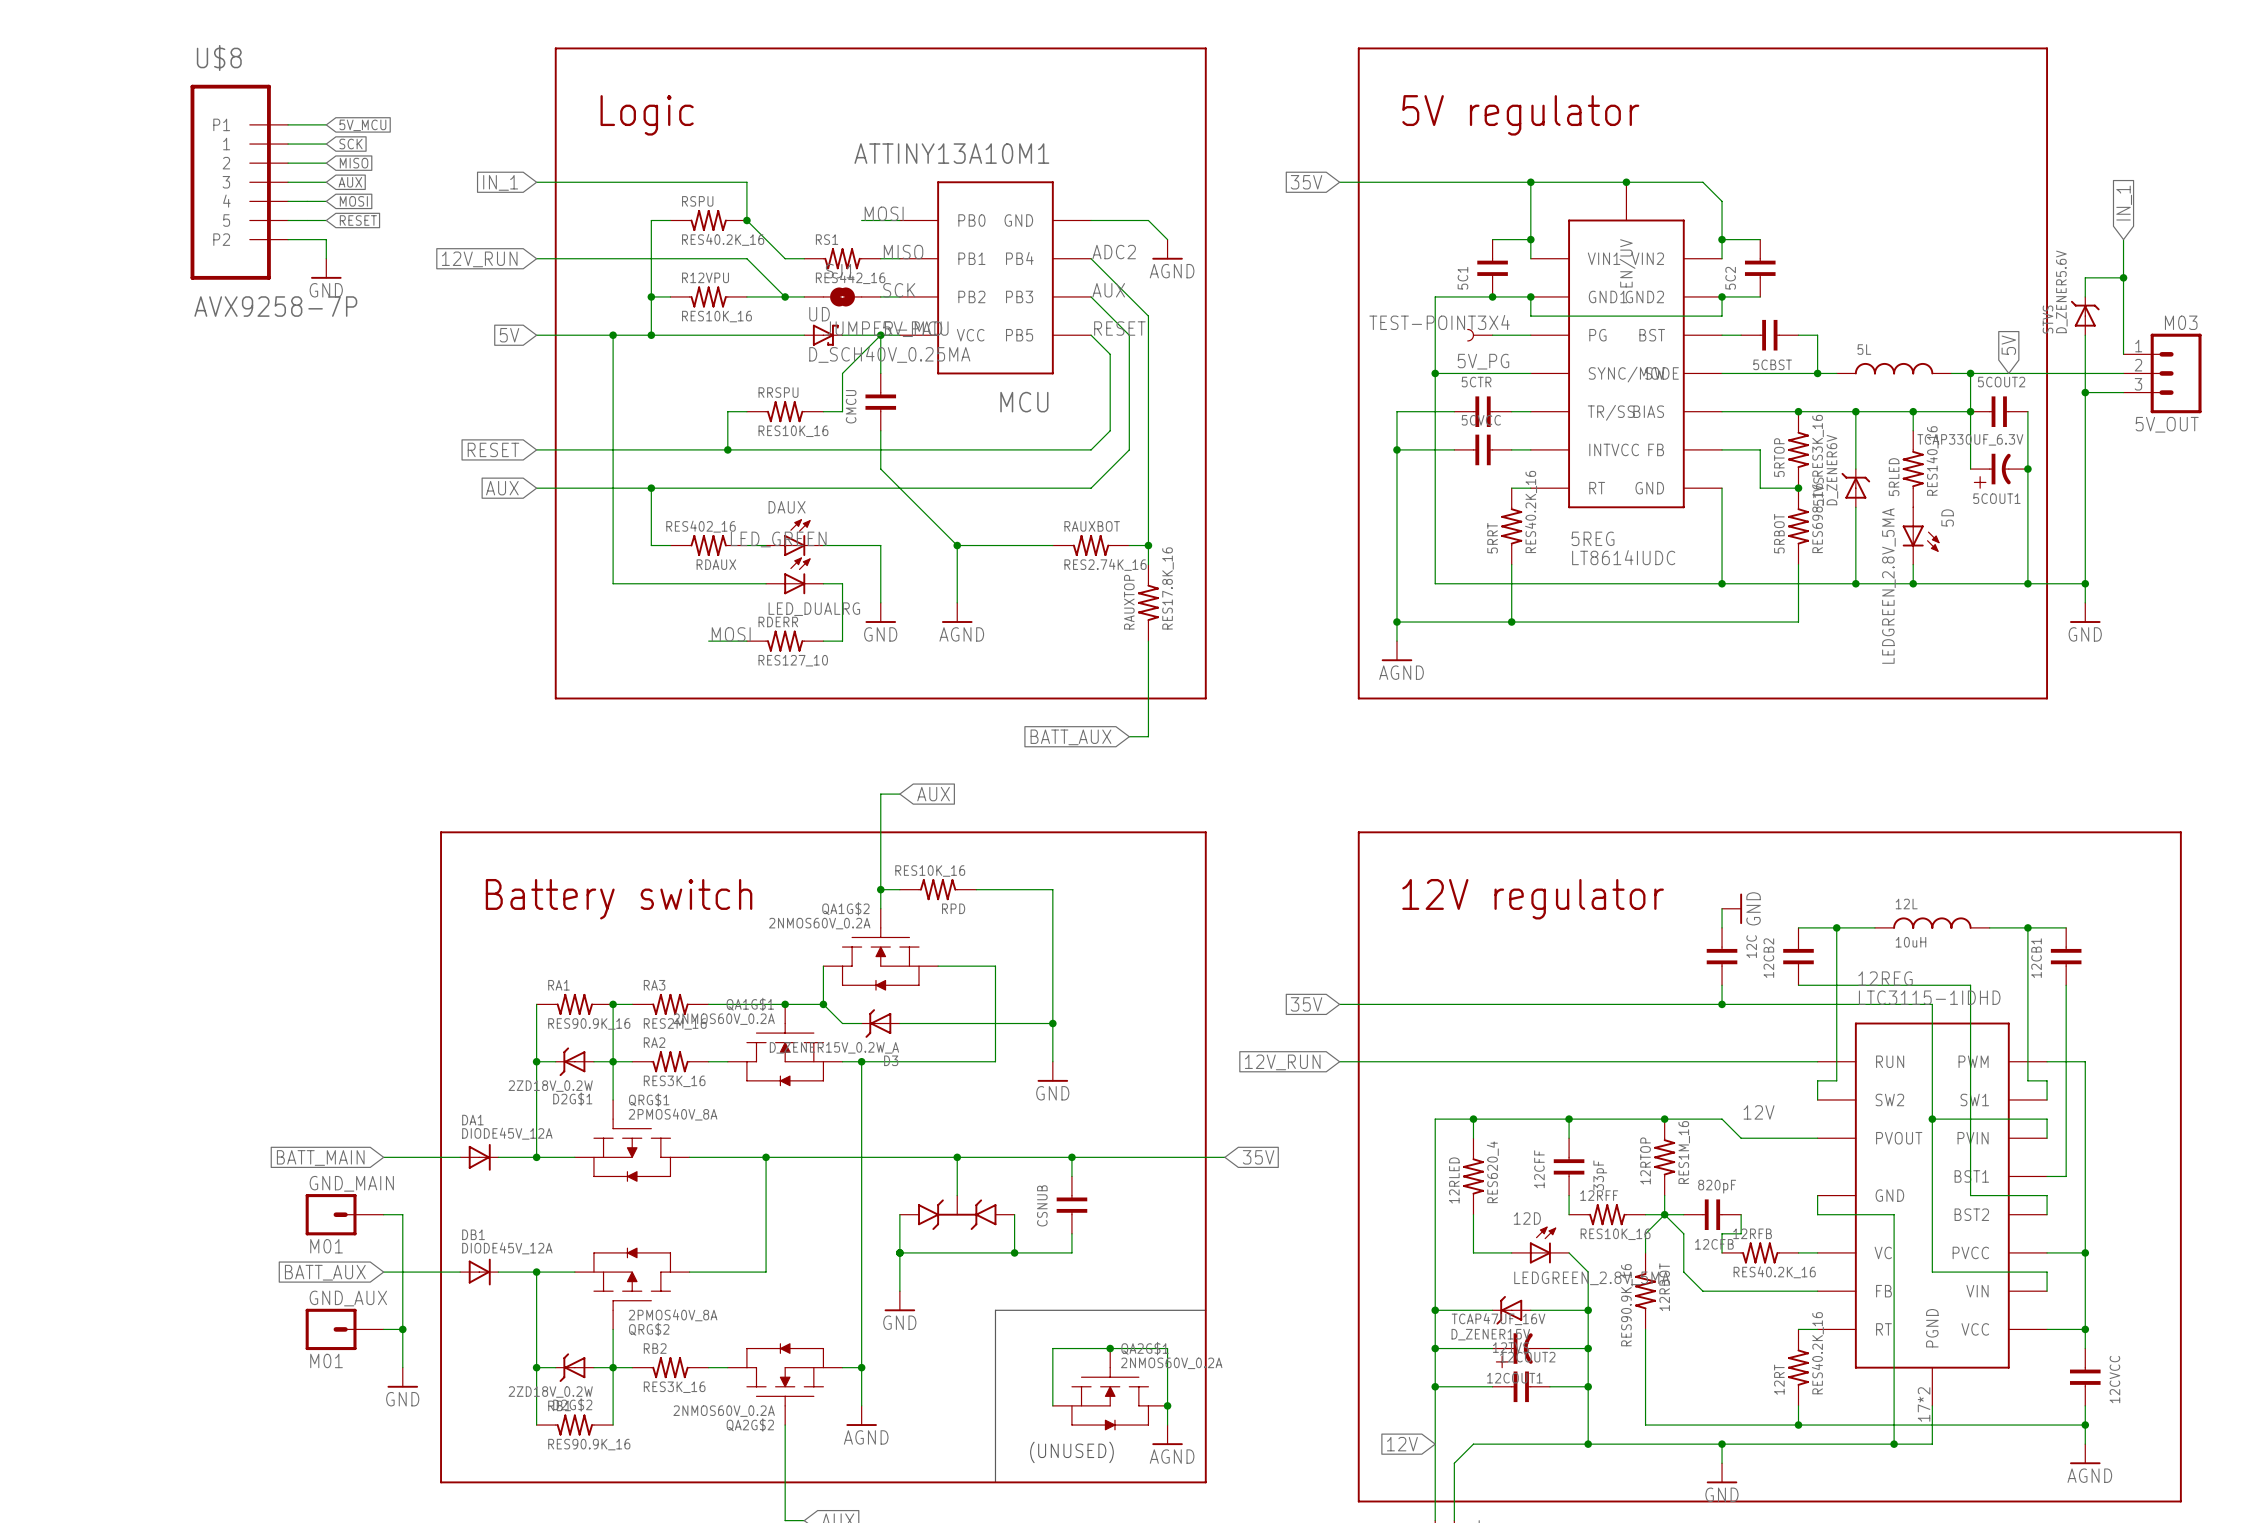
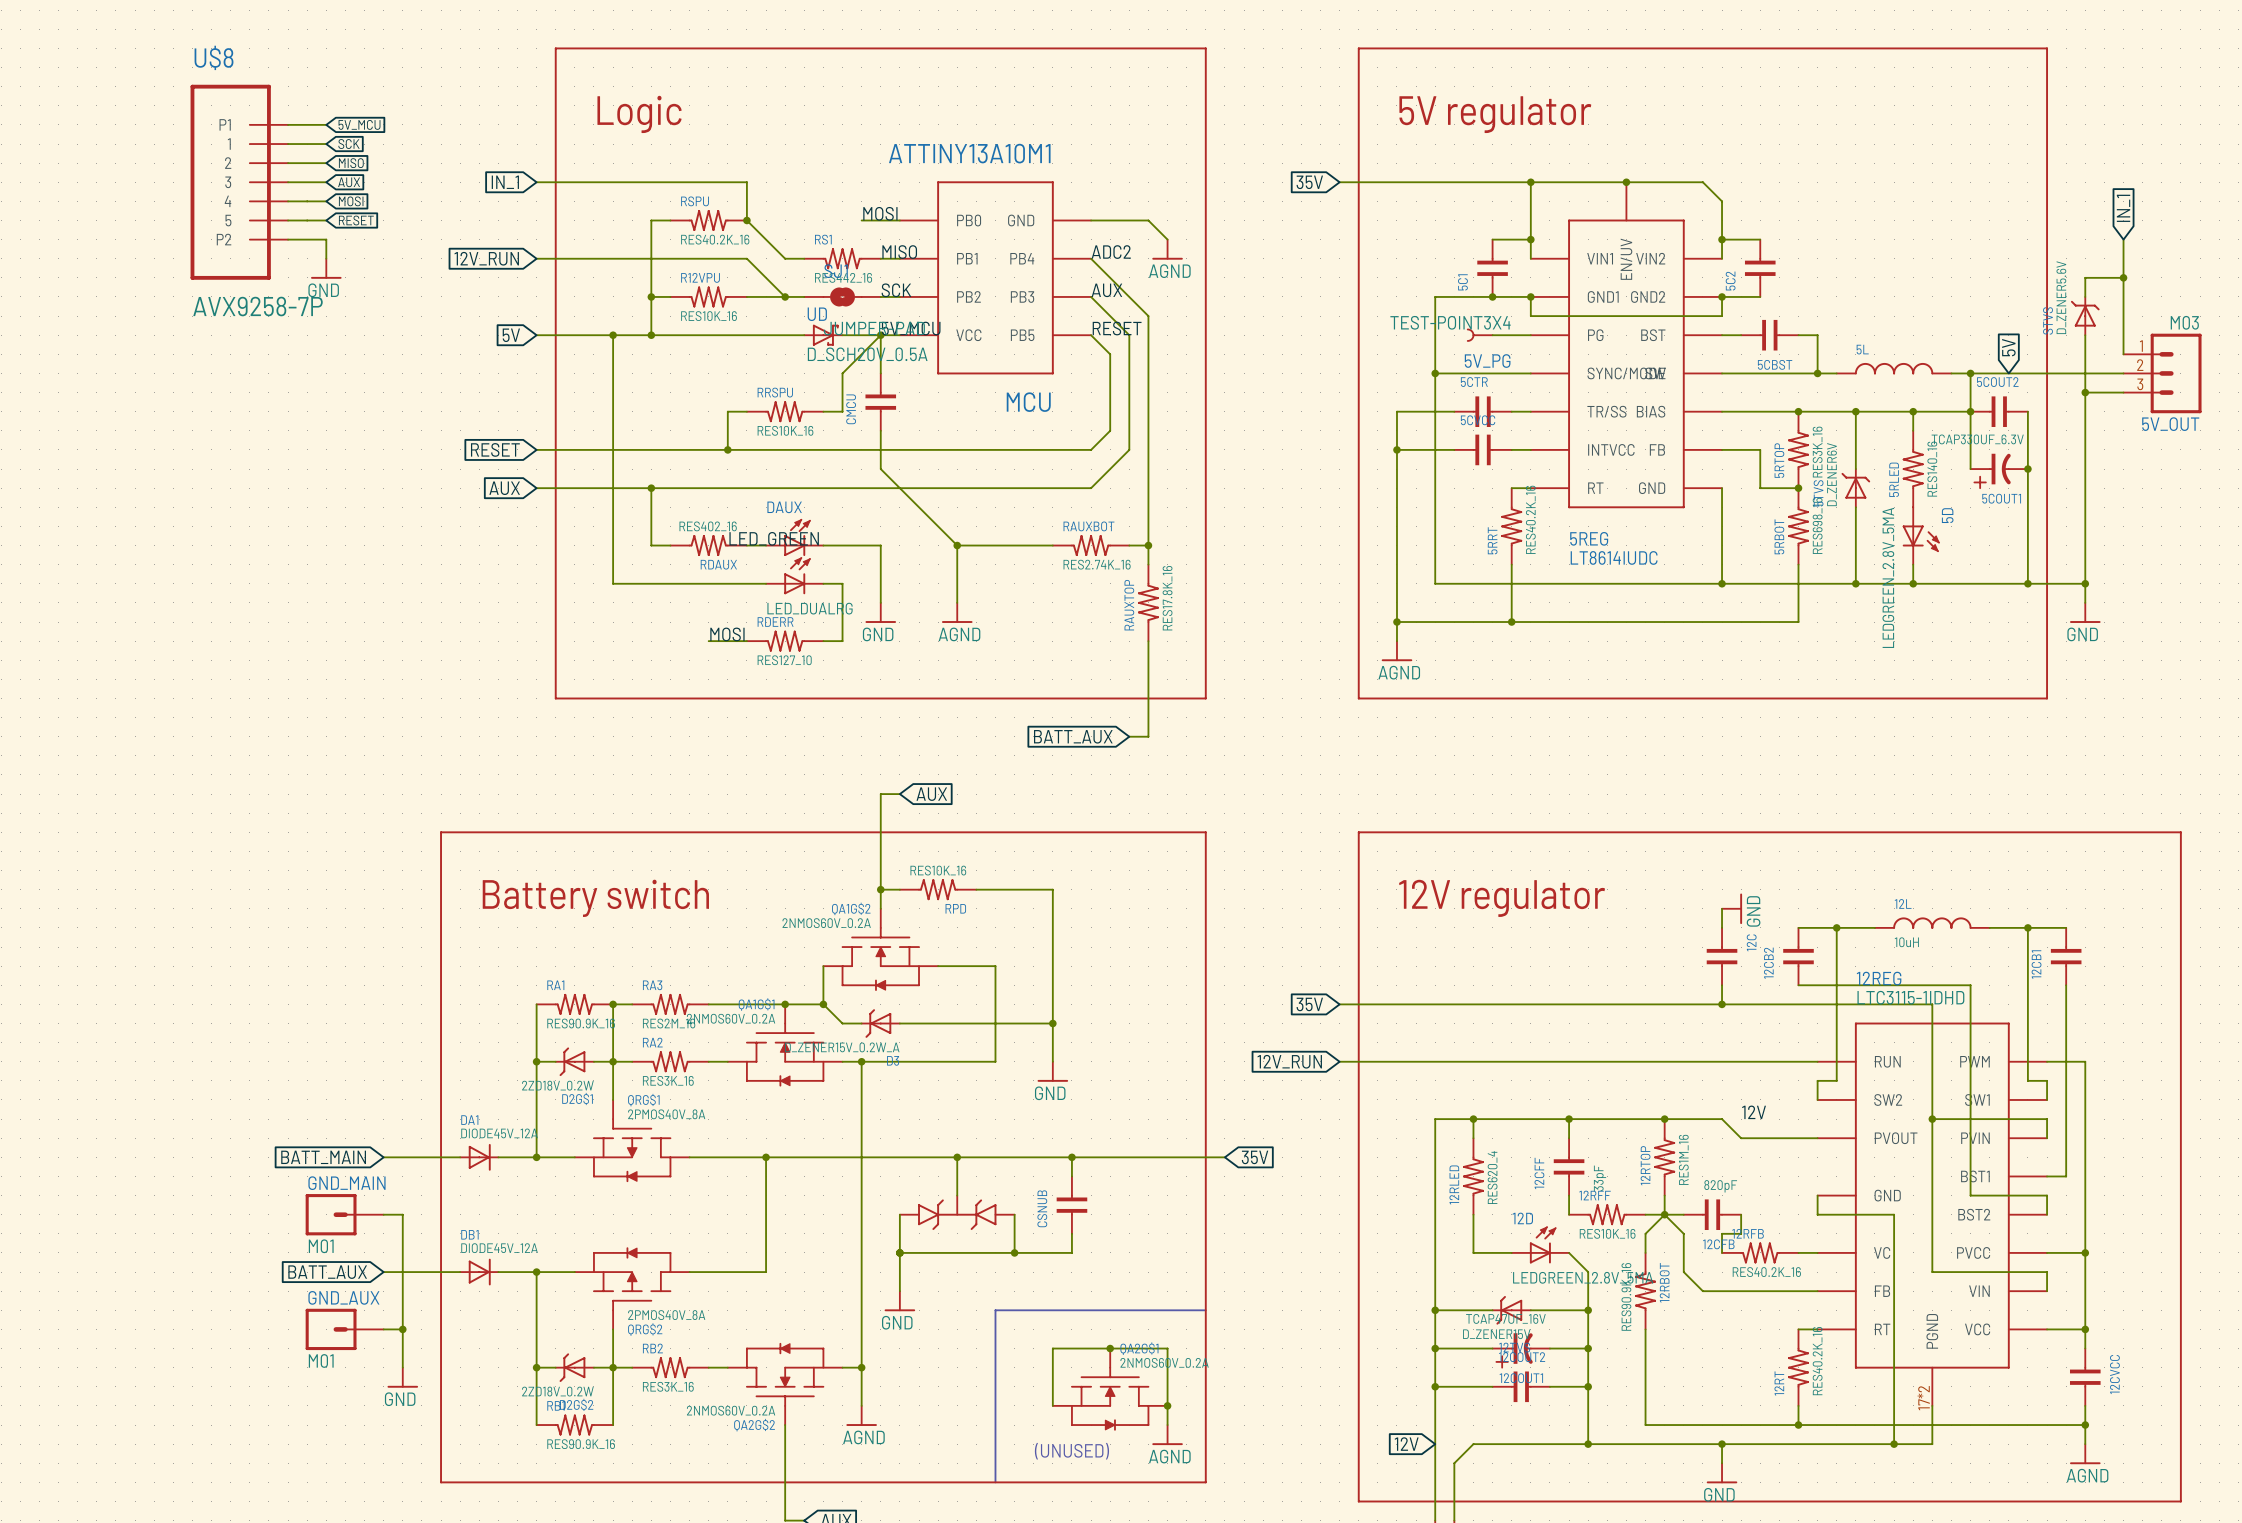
UD value: D_SCH40V_0.25MA (889, 354) -> D_SCH20V_0.5A (867, 354)

